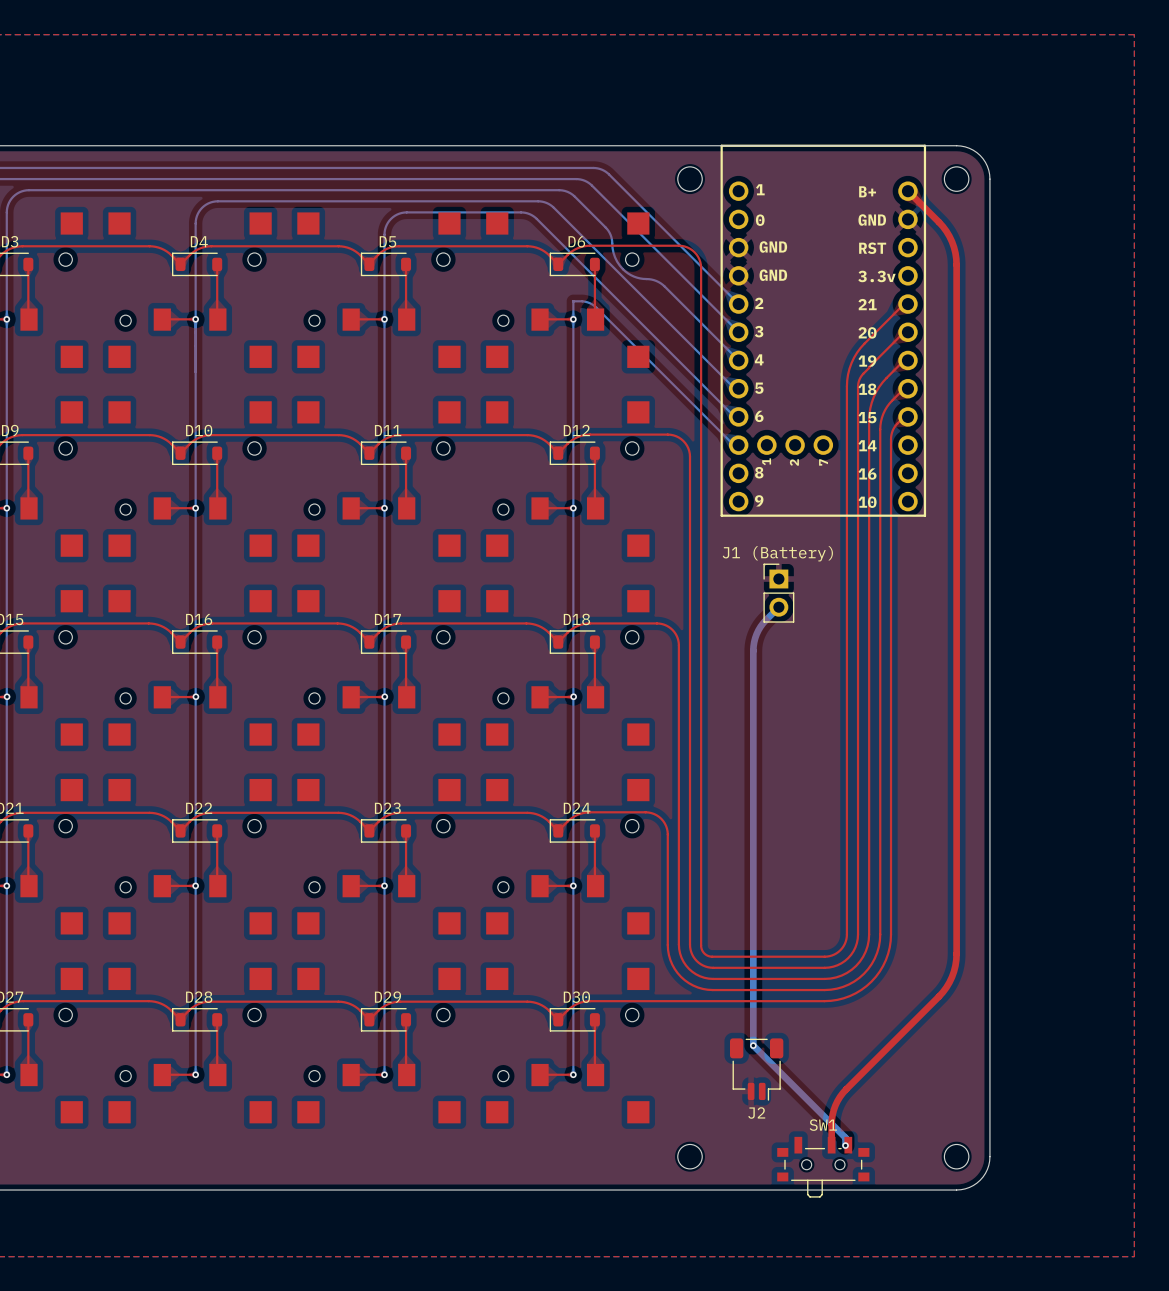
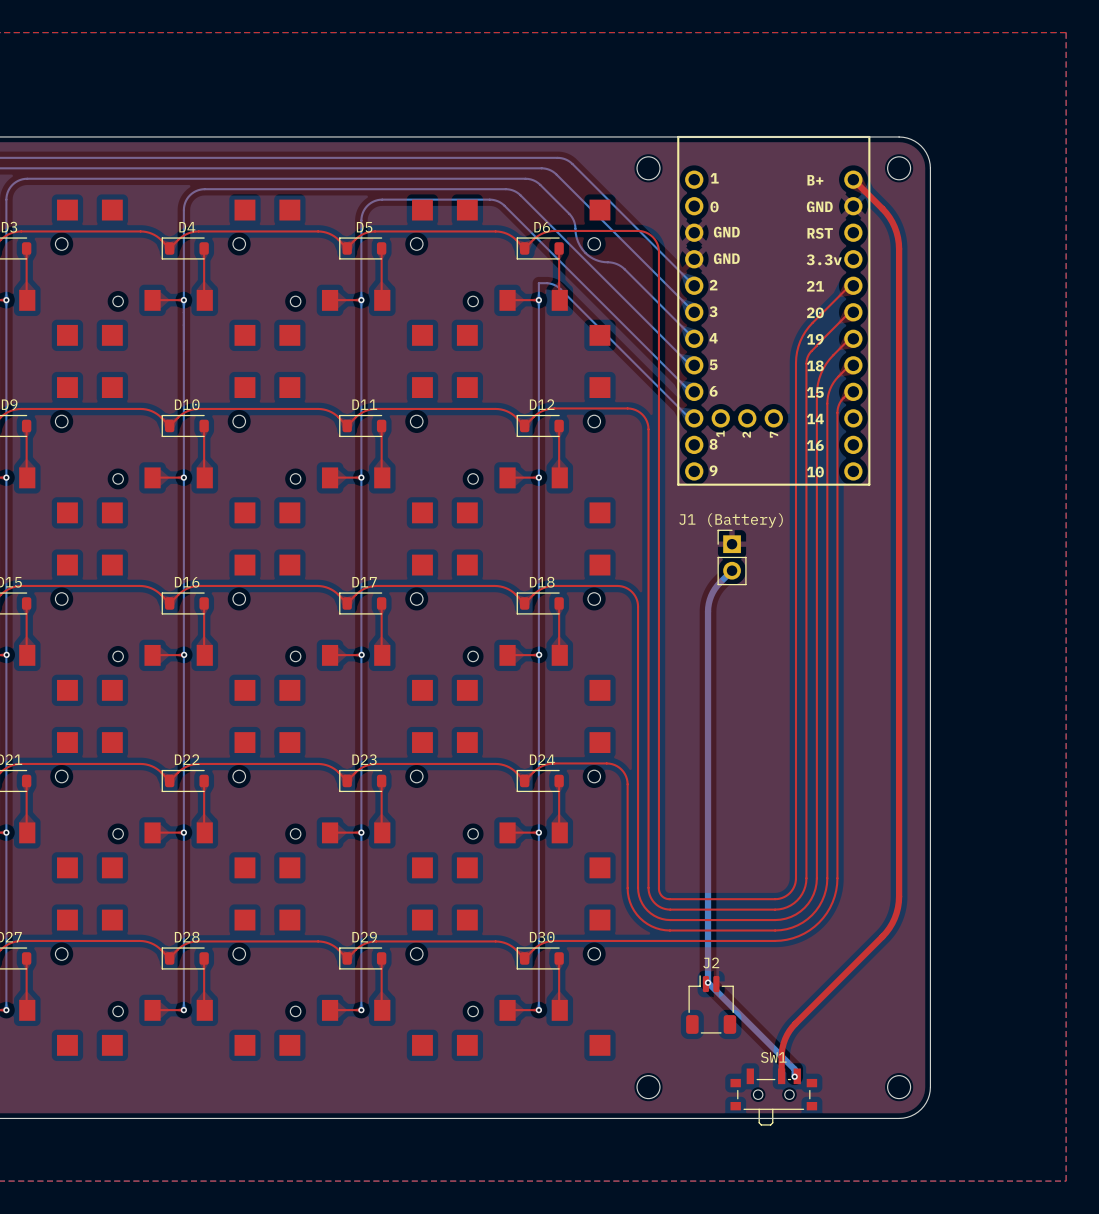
J2 rotation: 0° (756, 1069) -> 180° (711, 1004)

